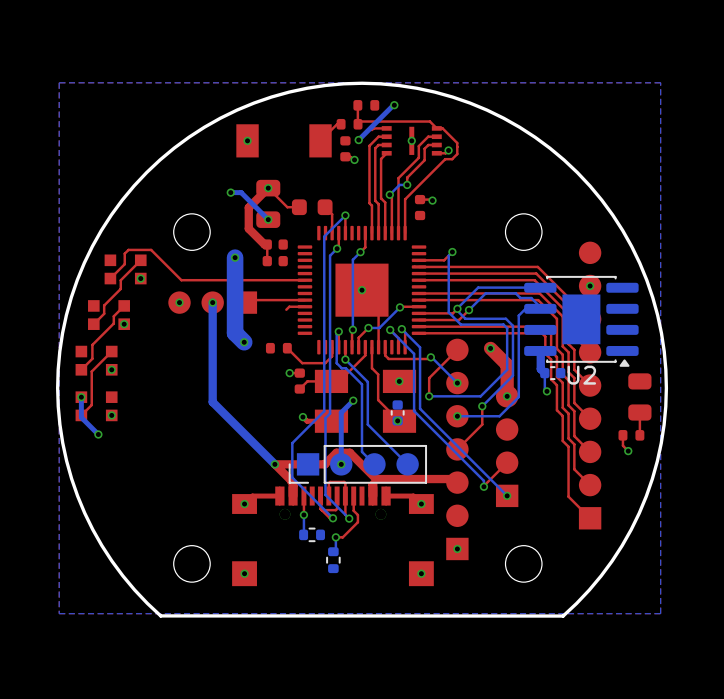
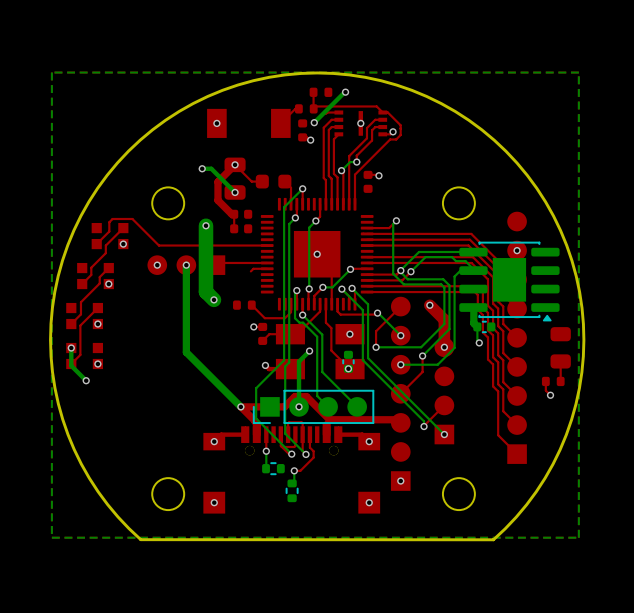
U2 name: U2 (581, 375) -> none

